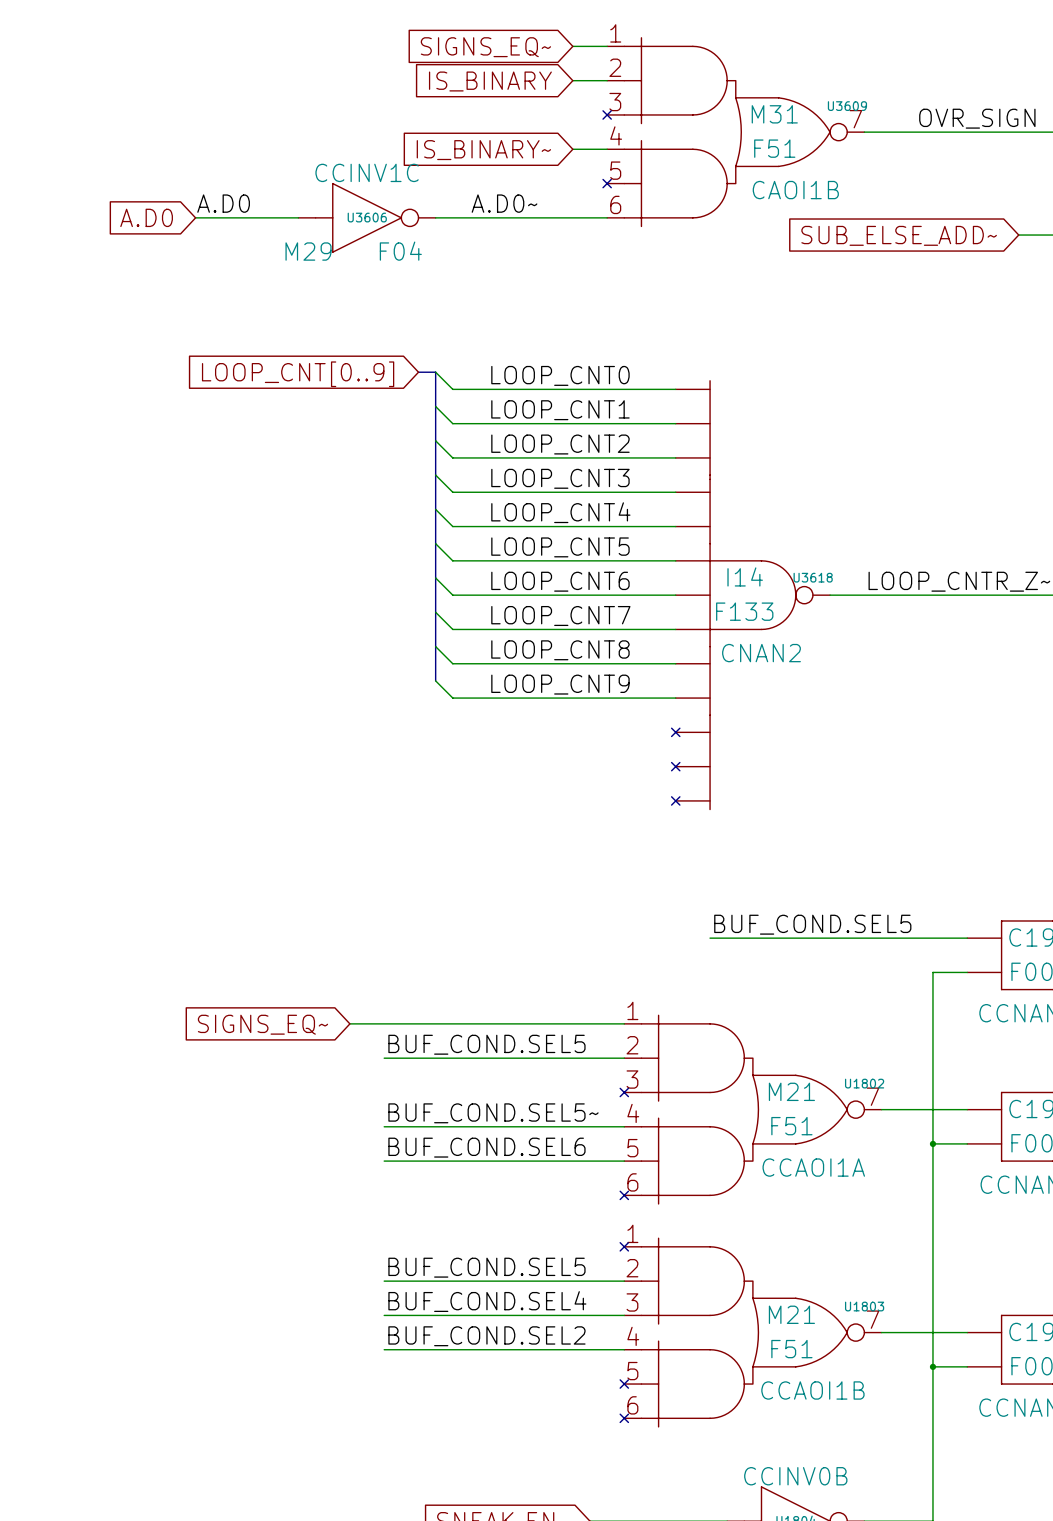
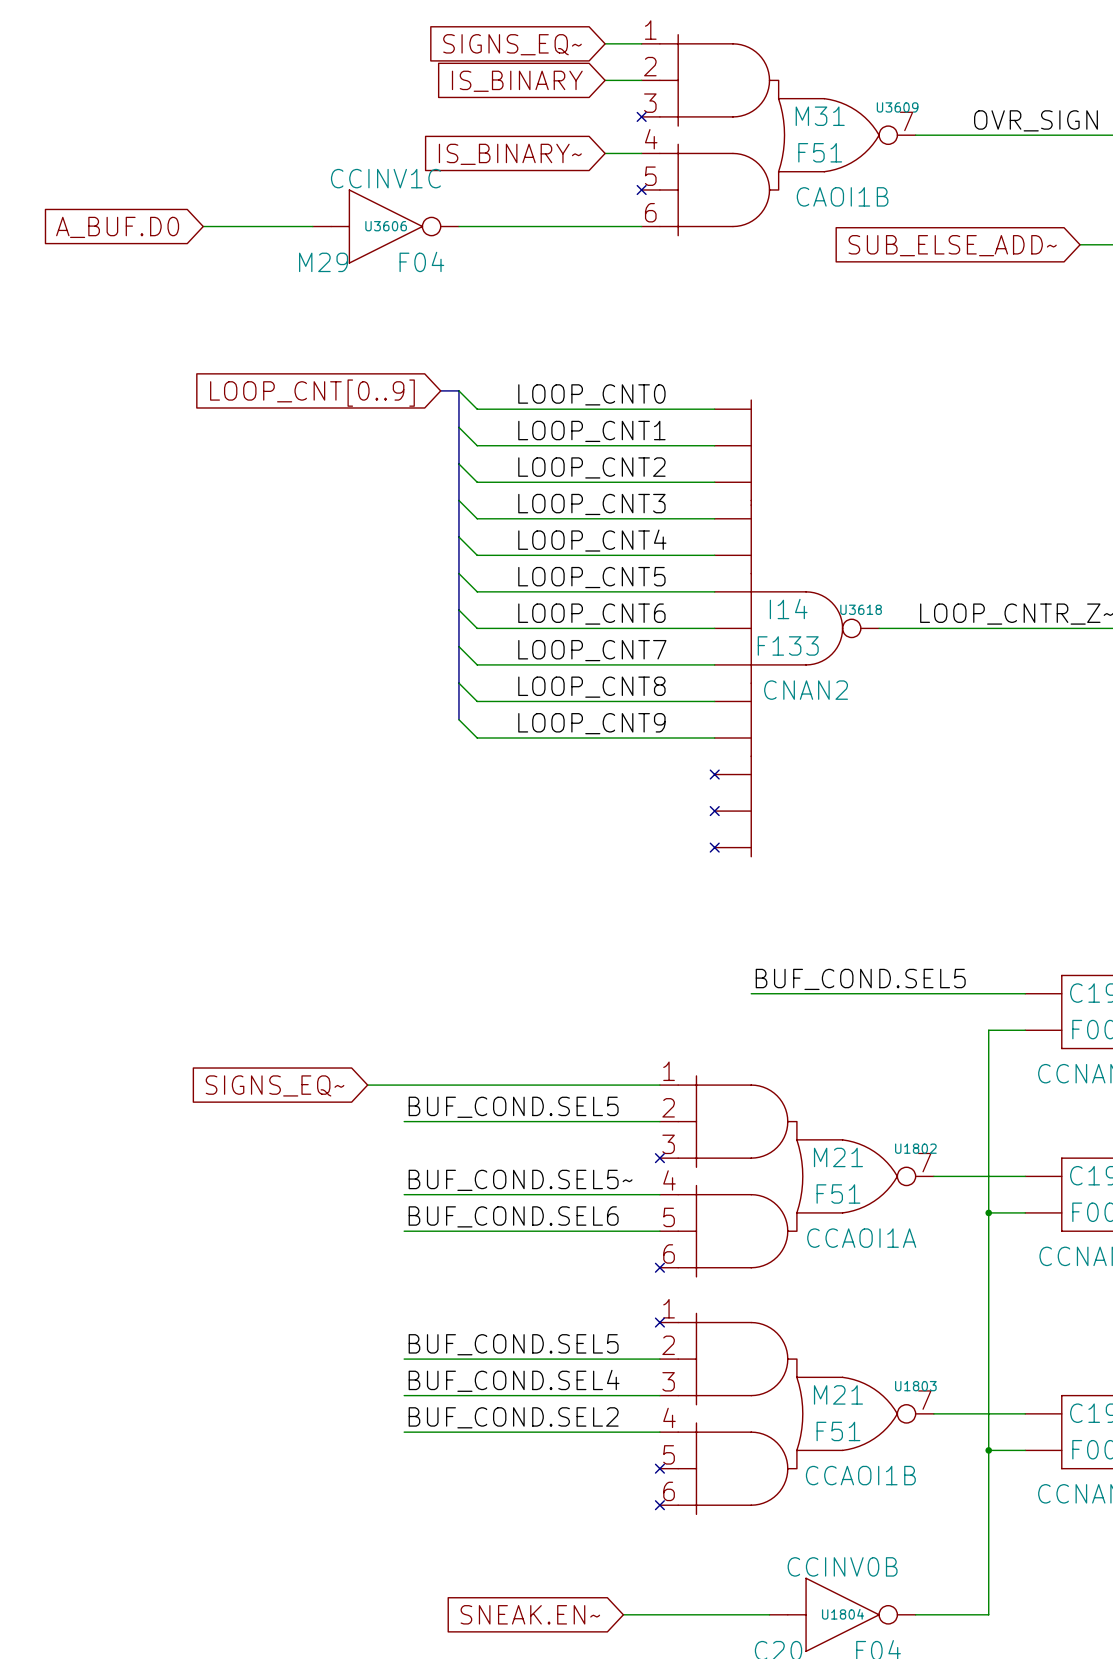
label: A.D0 (223, 203) -> none
label: A.D0~ (504, 203) -> none
global label: A.D0 (146, 217) -> A_BUF.D0 (117, 227)

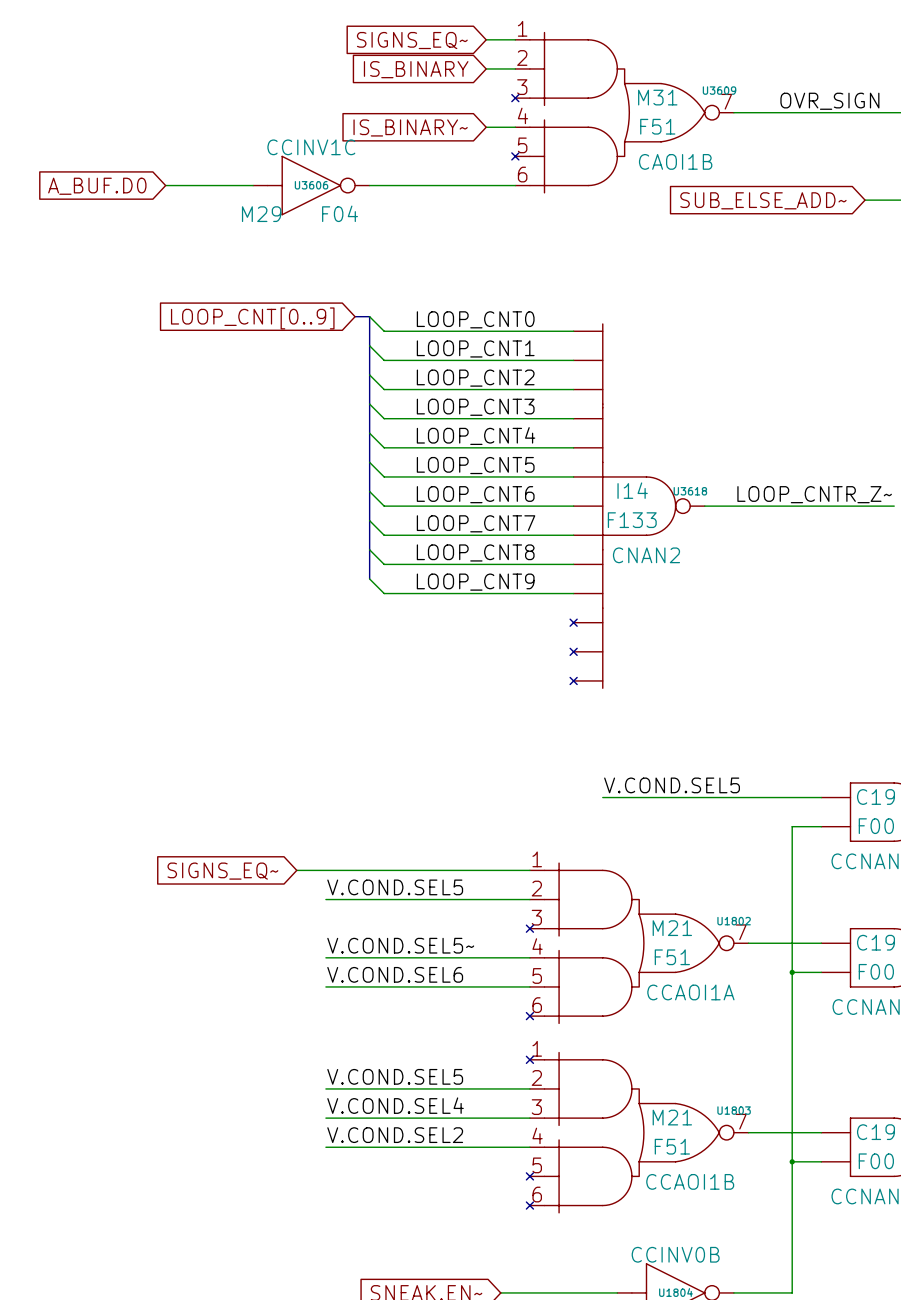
label: BUF_COND.SEL5 (860, 979) -> V.COND.SEL5 (672, 785)
label: BUF_COND.SEL5 (513, 1107) -> V.COND.SEL5 (395, 887)
label: BUF_COND.SEL5~ (520, 1180) -> V.COND.SEL5~ (400, 945)
label: BUF_COND.SEL6 (513, 1216) -> V.COND.SEL6 (395, 974)
label: BUF_COND.SEL5 (513, 1344) -> V.COND.SEL5 (395, 1076)
label: BUF_COND.SEL4 (514, 1380) -> V.COND.SEL4 (395, 1105)
label: BUF_COND.SEL2 (513, 1417) -> V.COND.SEL2 (395, 1135)

